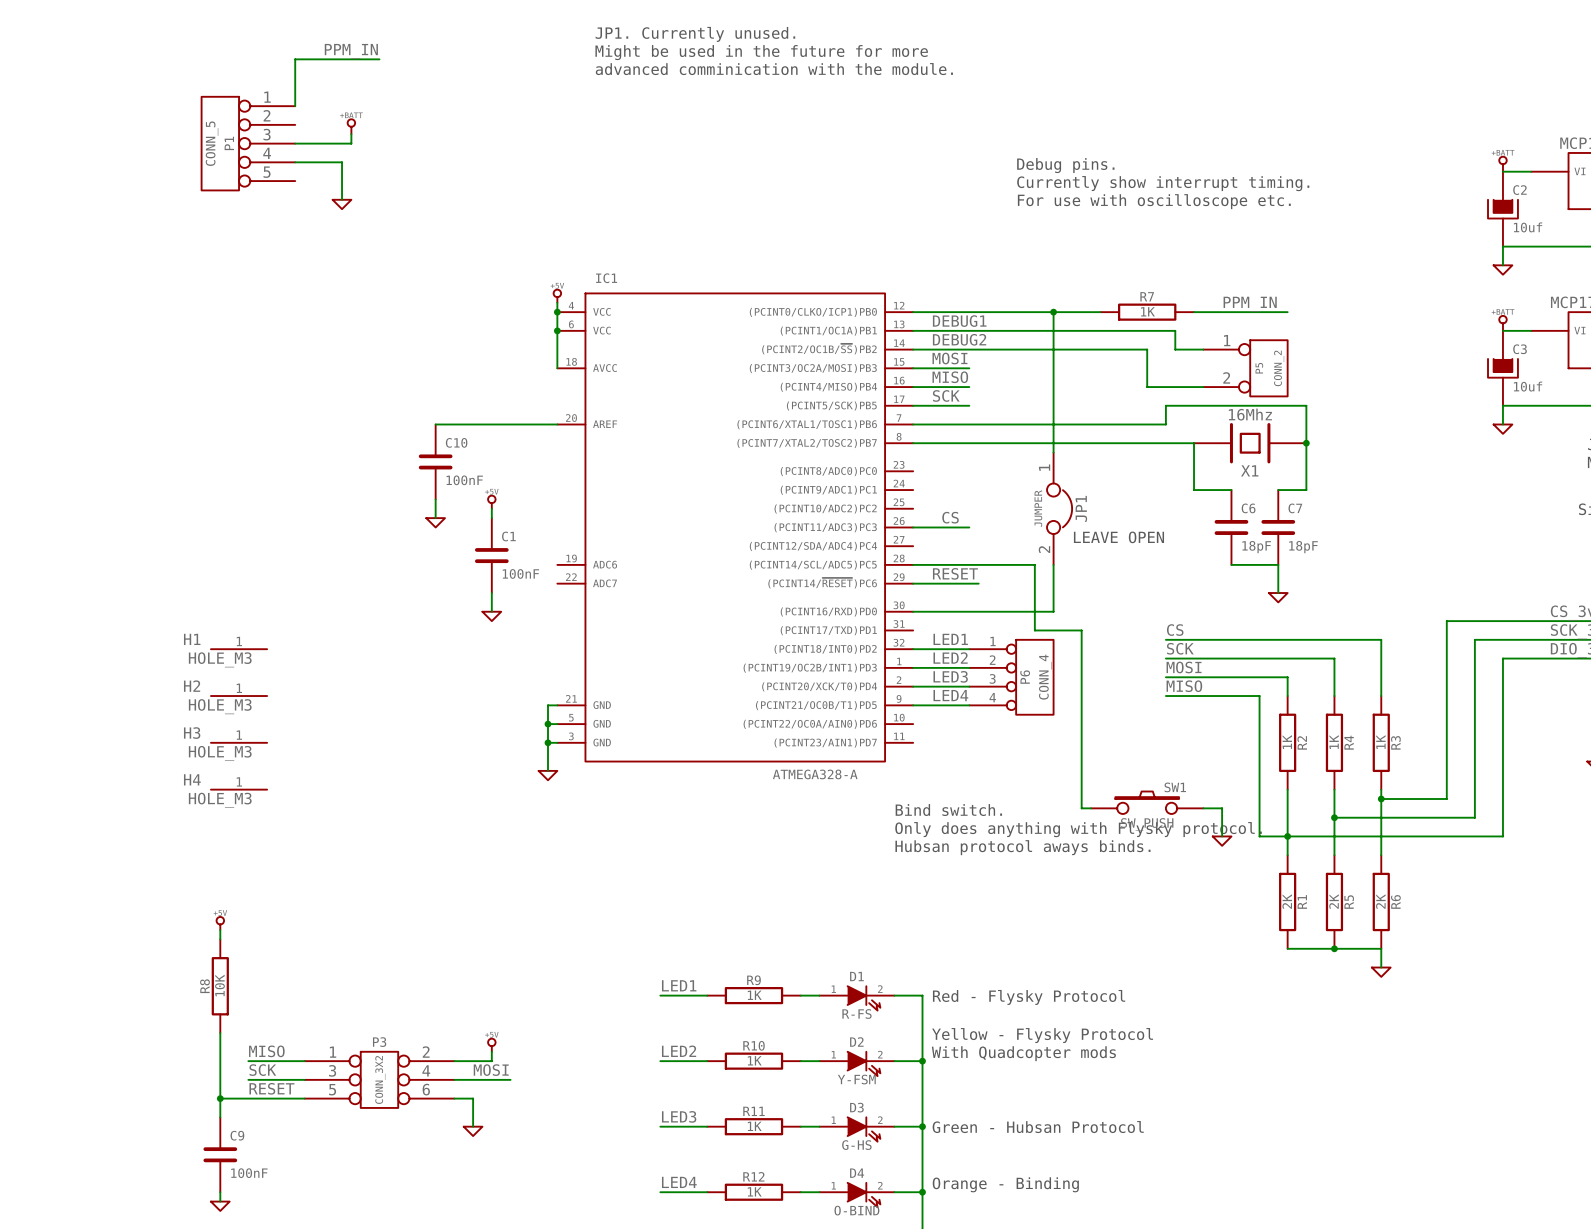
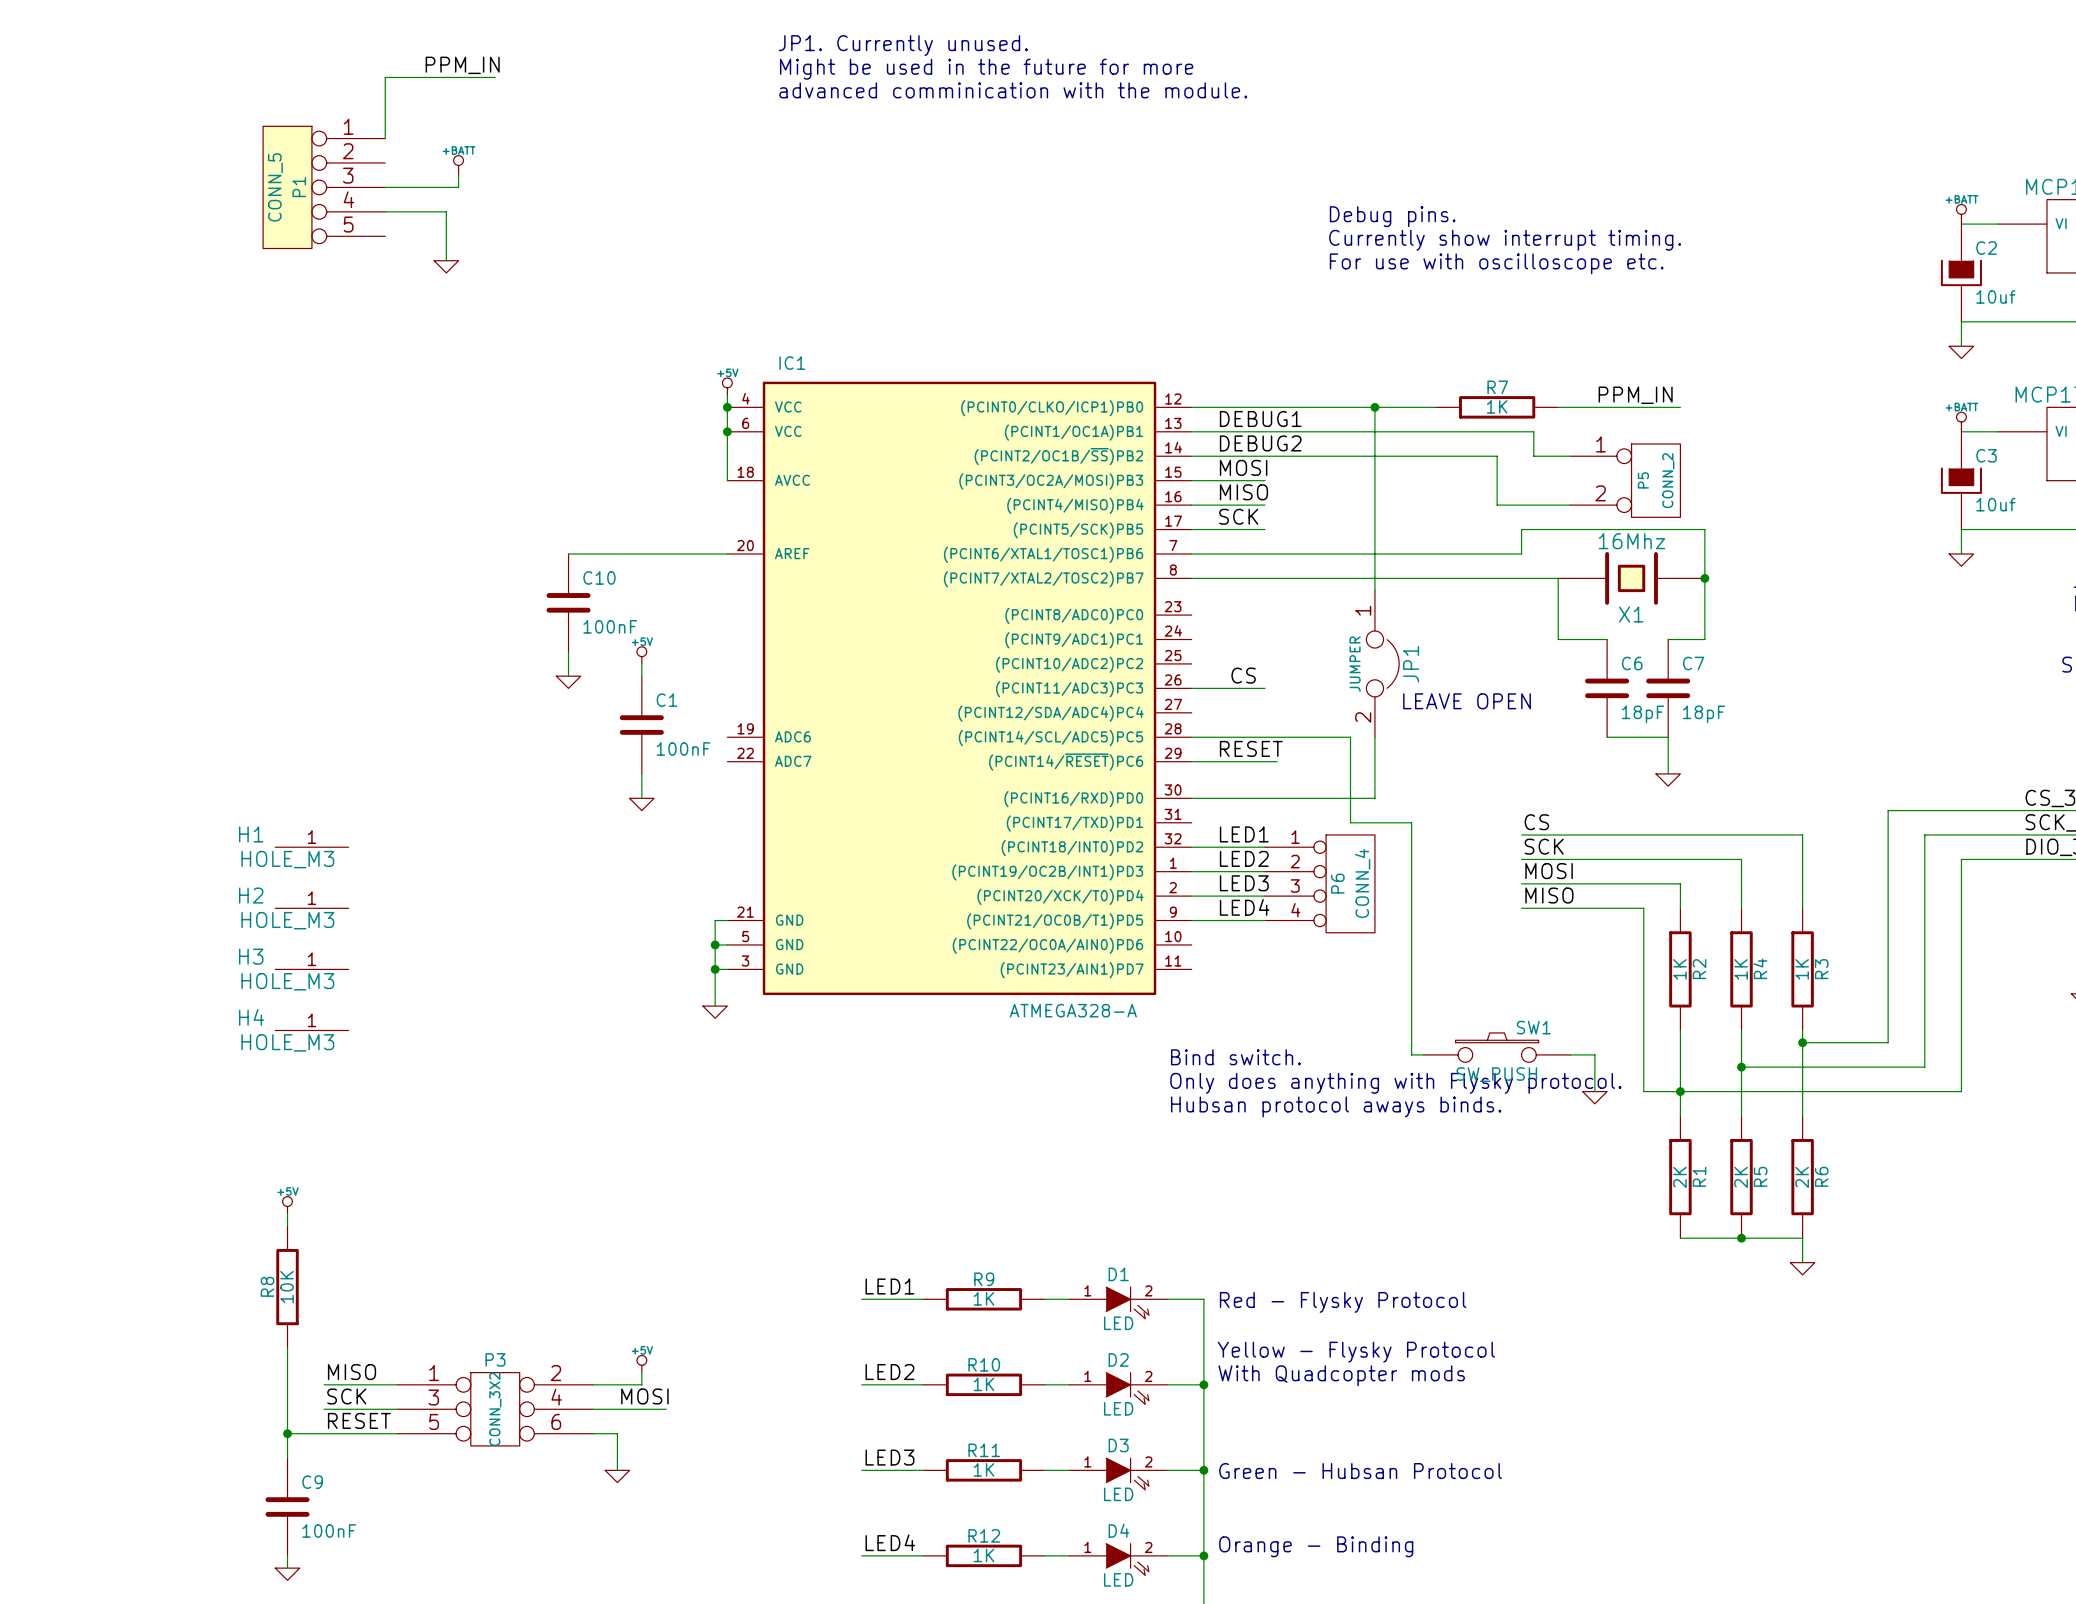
D1 value: R-FS (856, 1013) -> LED (1118, 1323)
D2 value: Y-FSM (856, 1079) -> LED (1118, 1408)
D3 value: G-HS (856, 1145) -> LED (1118, 1494)
D4 value: O-BIND (856, 1210) -> LED (1118, 1579)

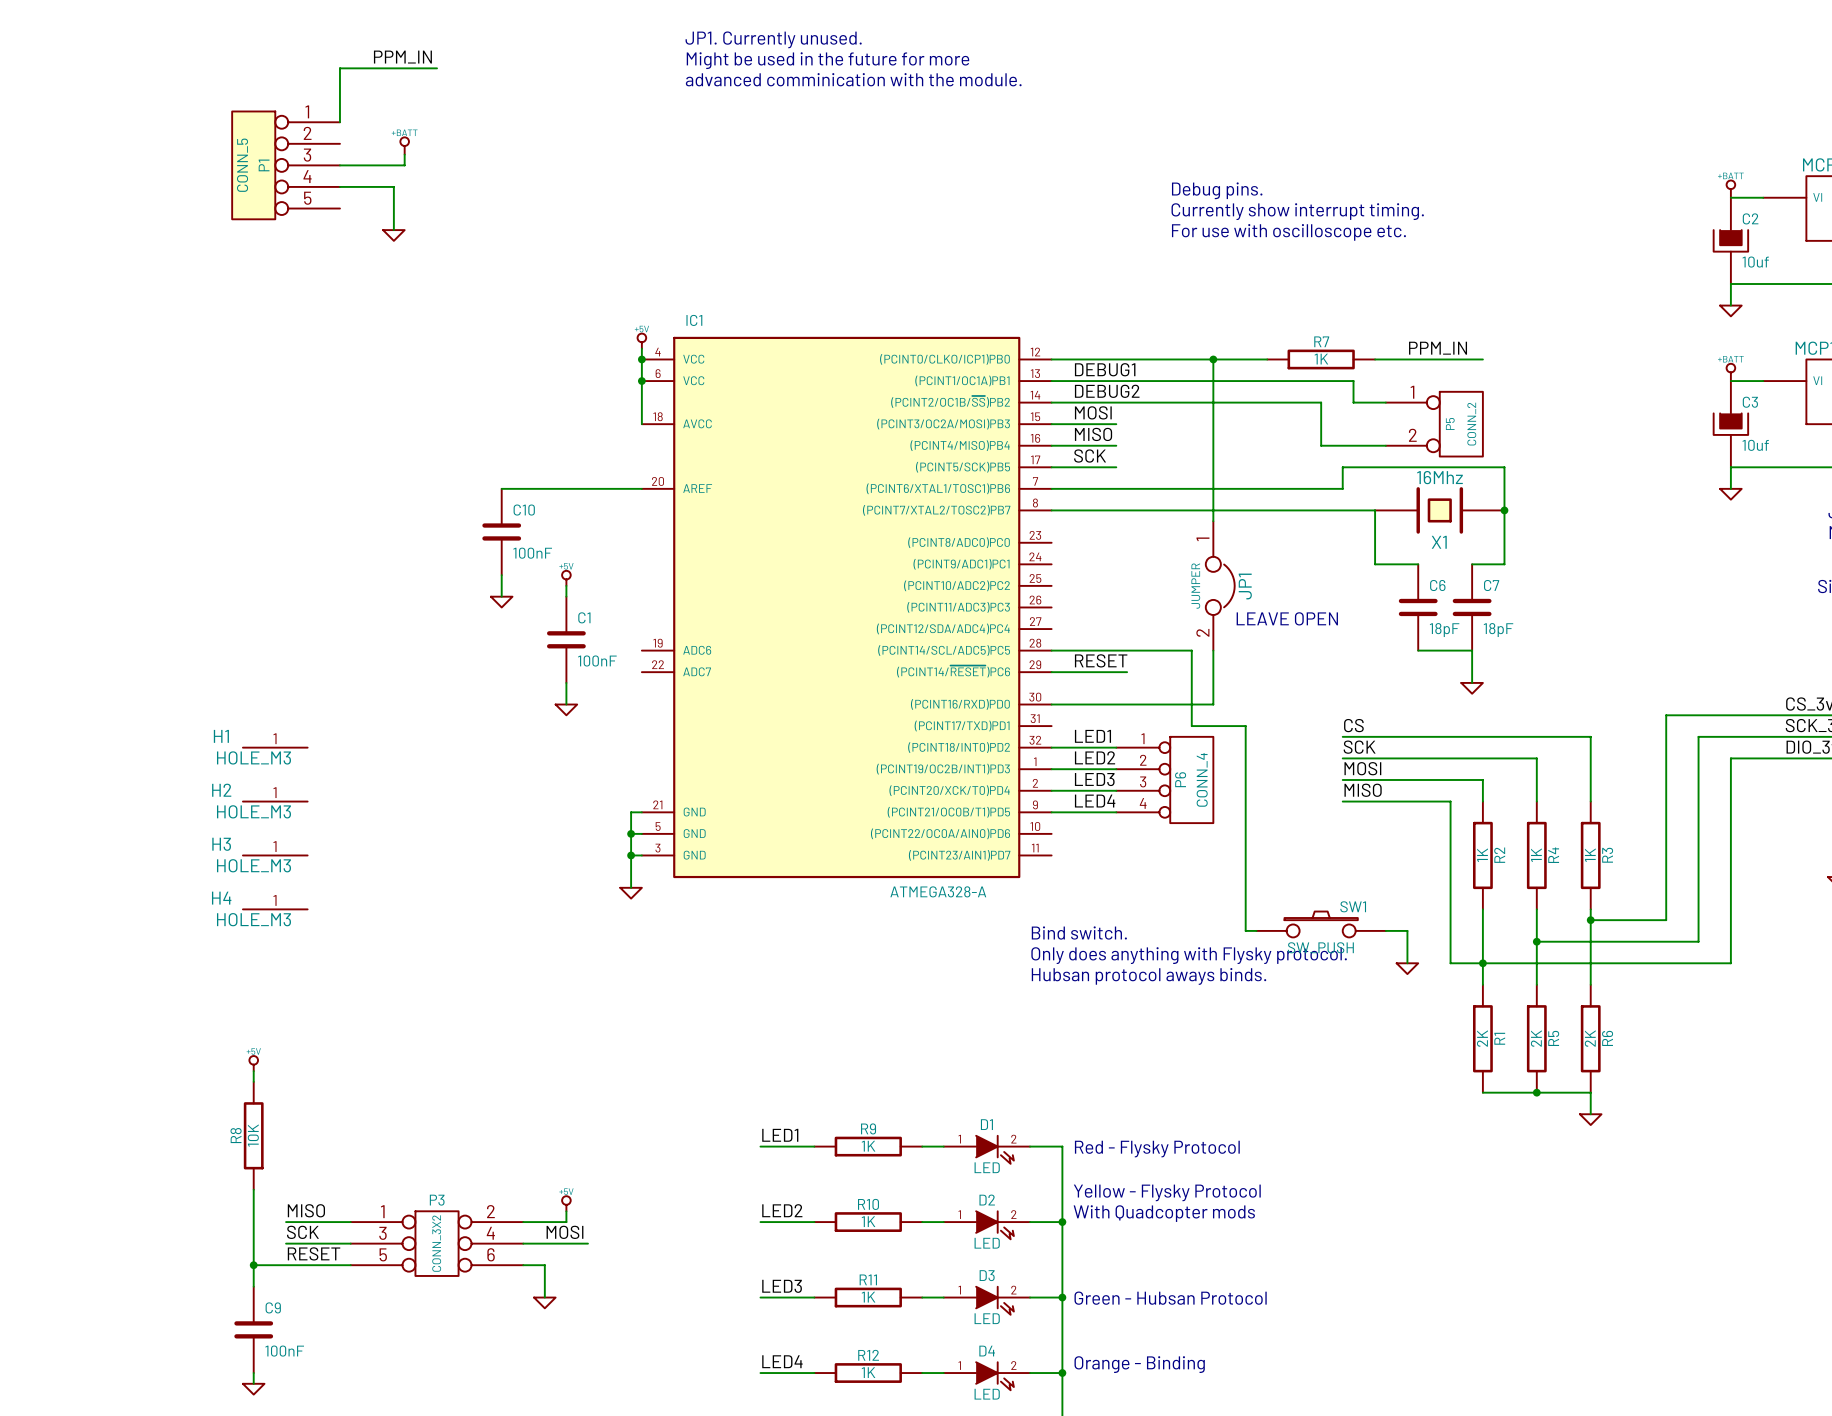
label: CS (1243, 675) -> none
wire: (1191, 688) (1264, 688) -> none

